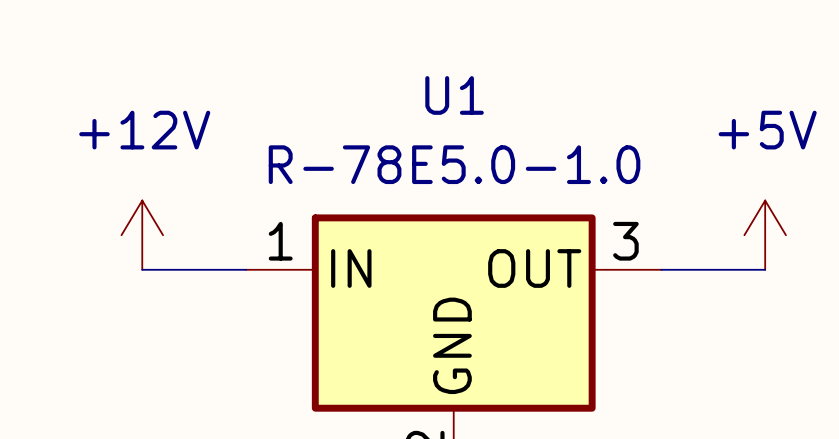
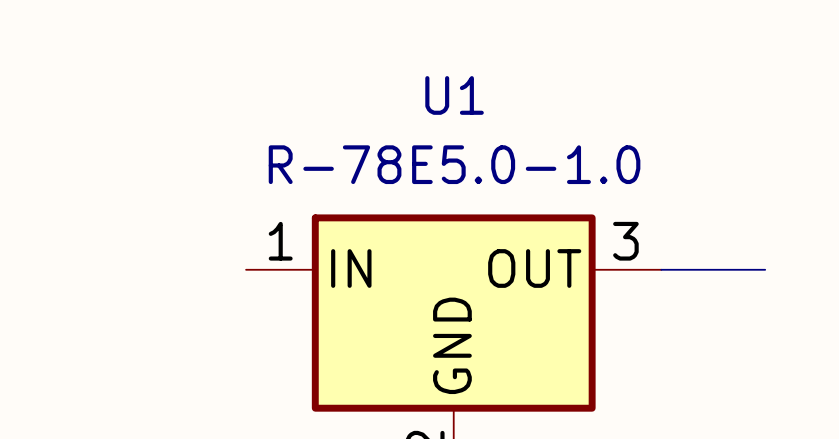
power symbol: +12V (142, 235) -> none
power symbol: +5V (765, 235) -> none
wire: (142, 269) (246, 269) -> none

